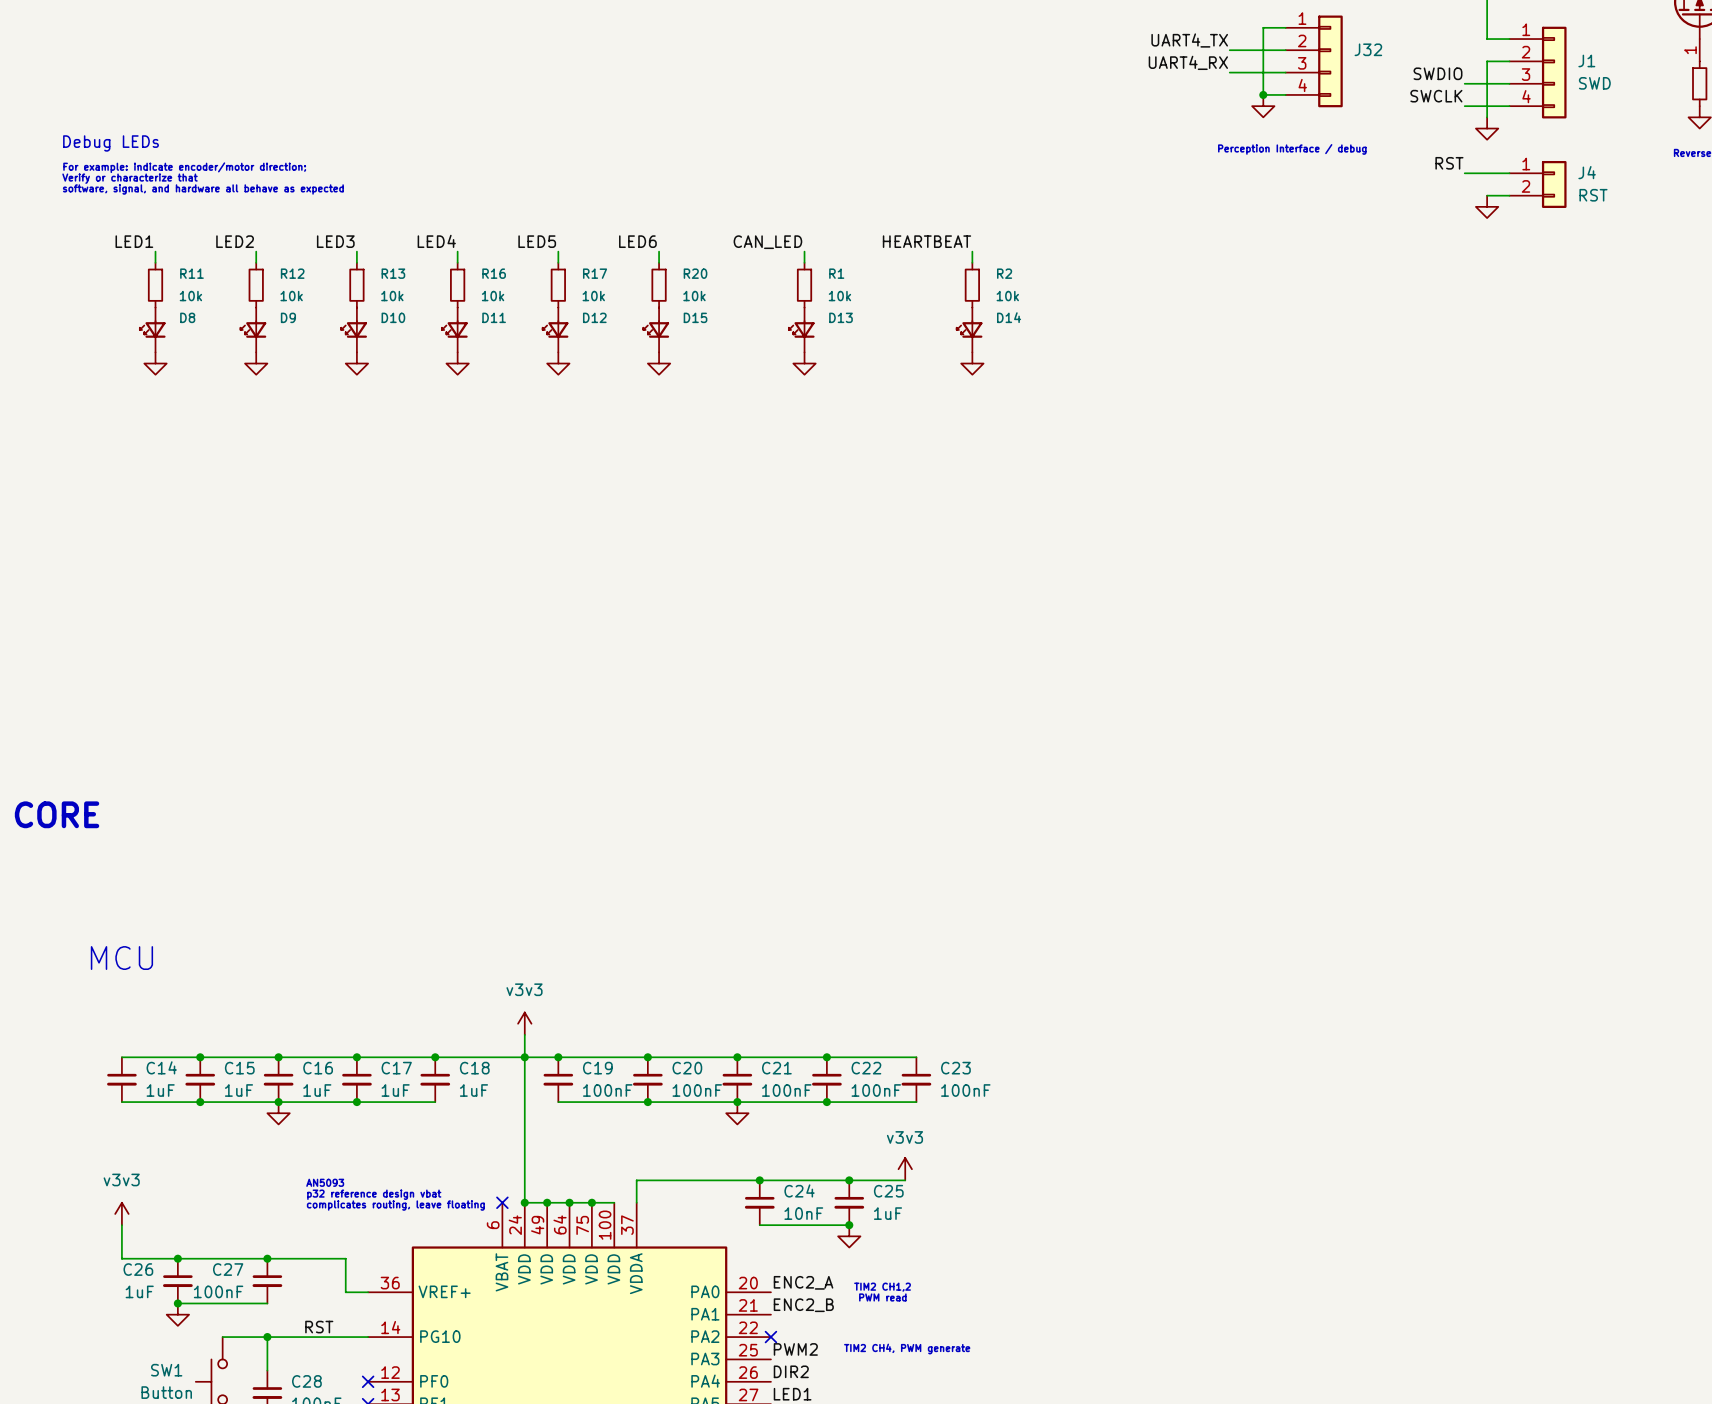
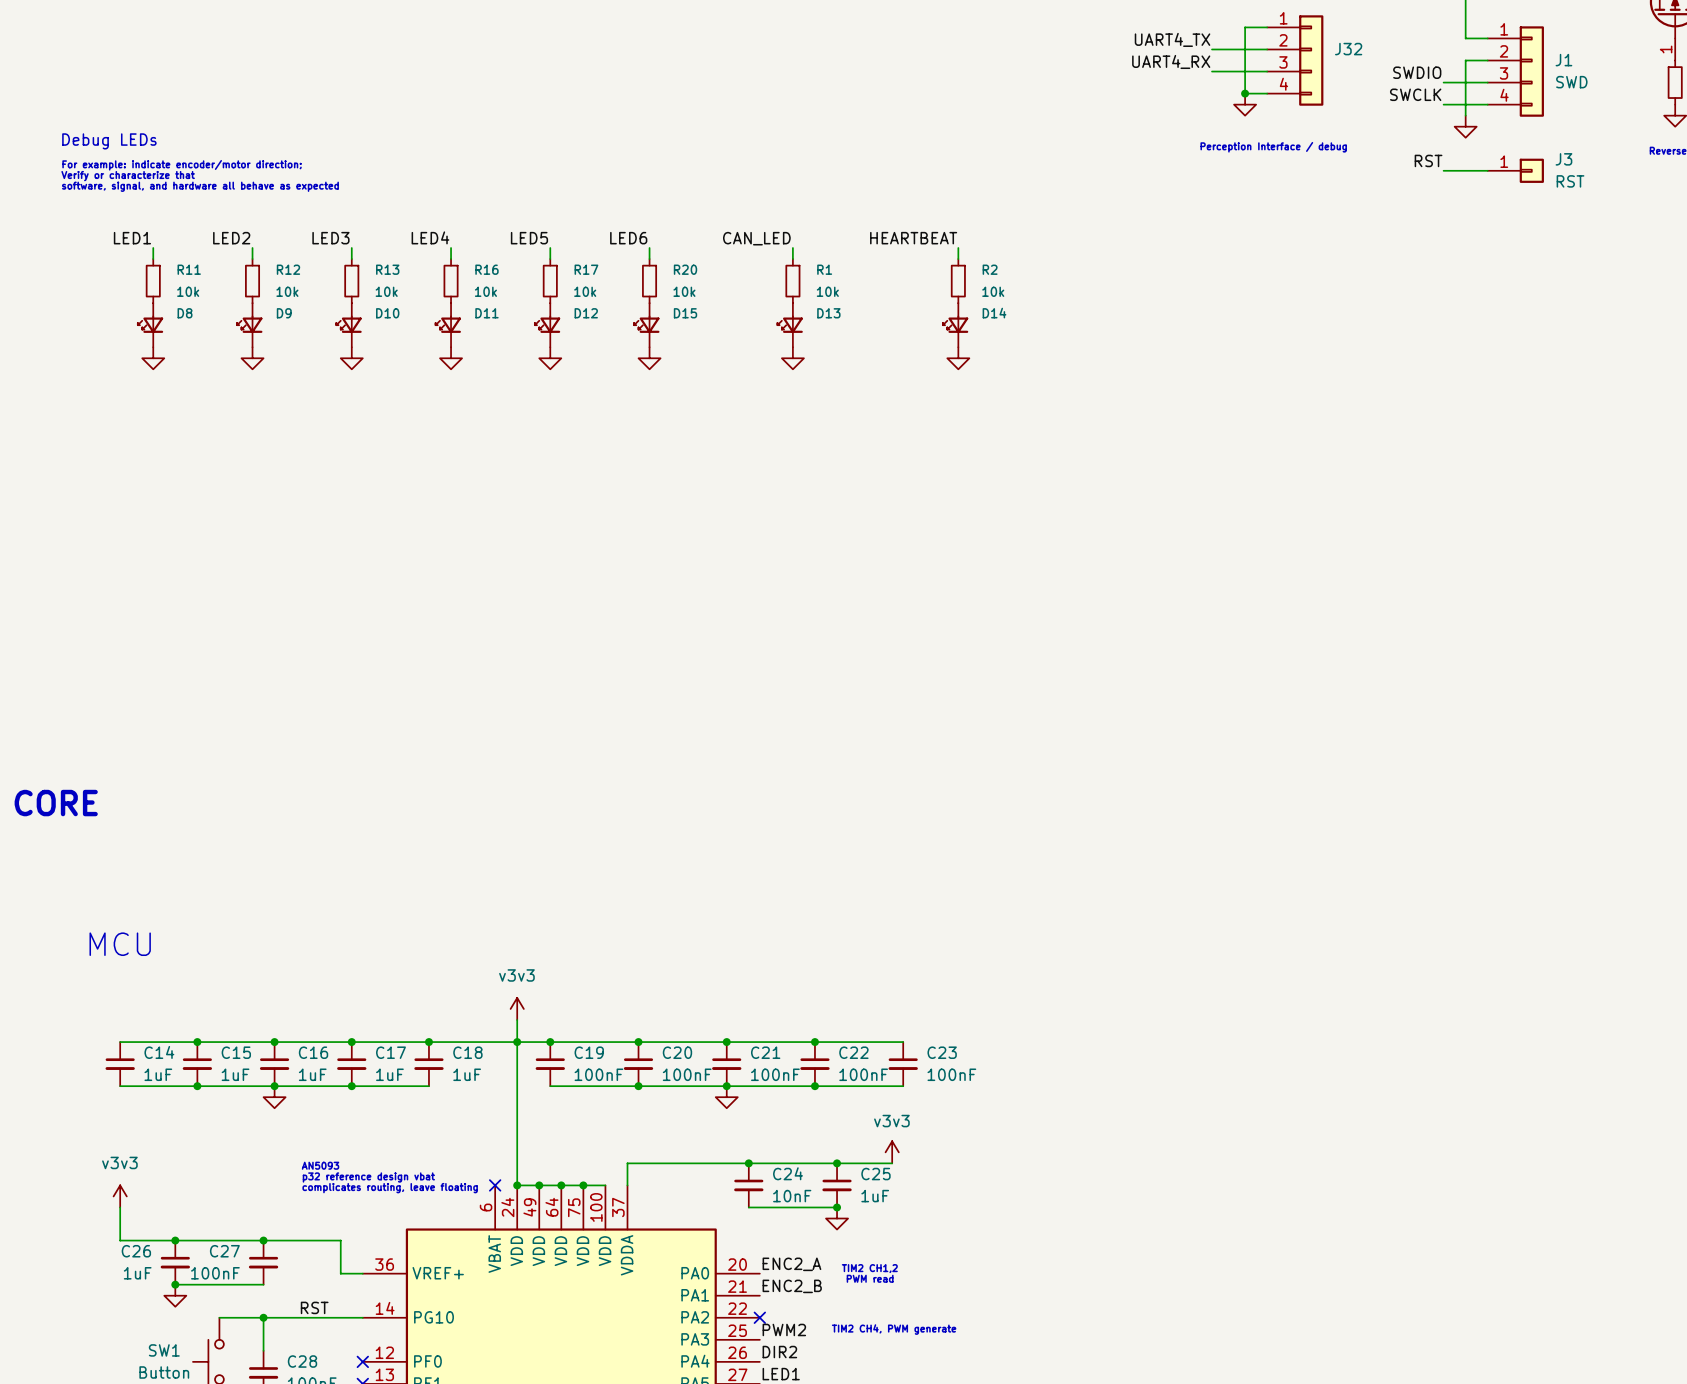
J3: none -> RST (1515, 170)
J4: RST (1538, 184) -> none
wire: (1487, 195) (1509, 195) -> none
power symbol: (1487, 206) -> none

